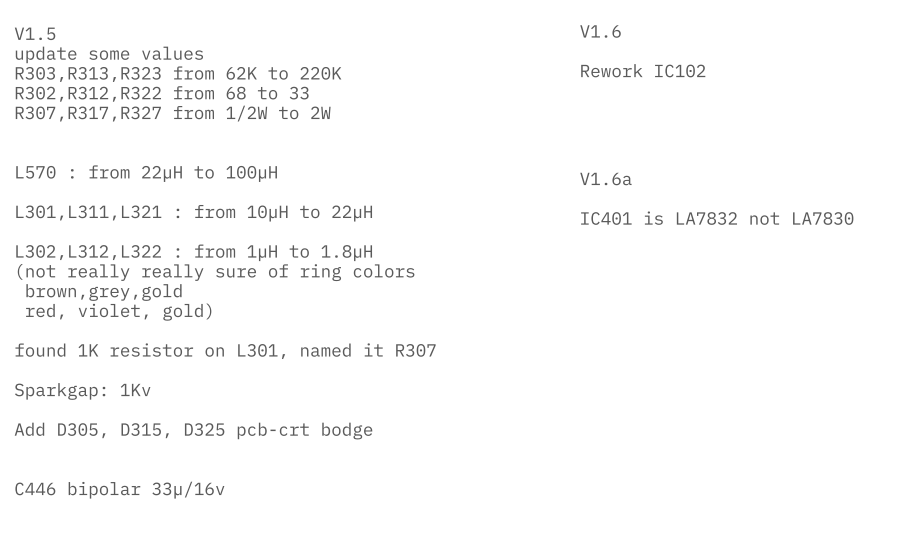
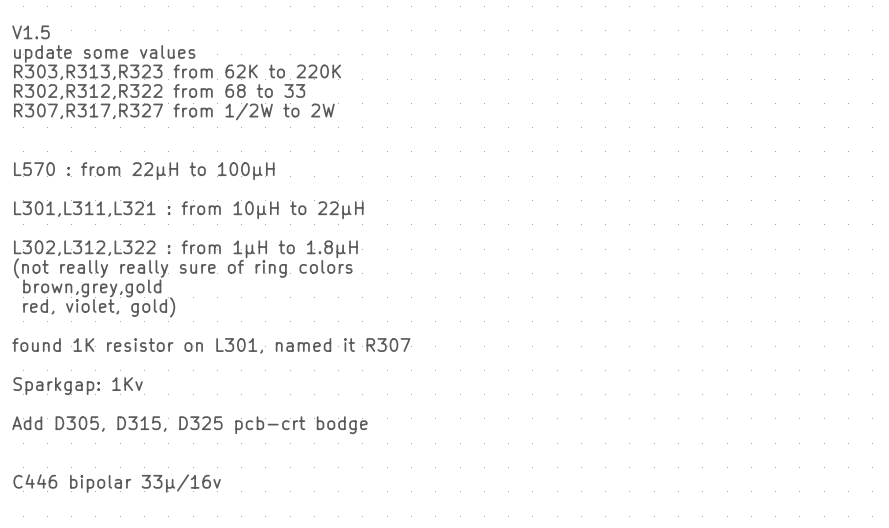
text: V1.6 (600, 31) -> none
text: Rework IC102 (643, 70) -> none
text: V1.6a (605, 179) -> none
text: IC401 is LA7832 not LA7830 (717, 218) -> none

